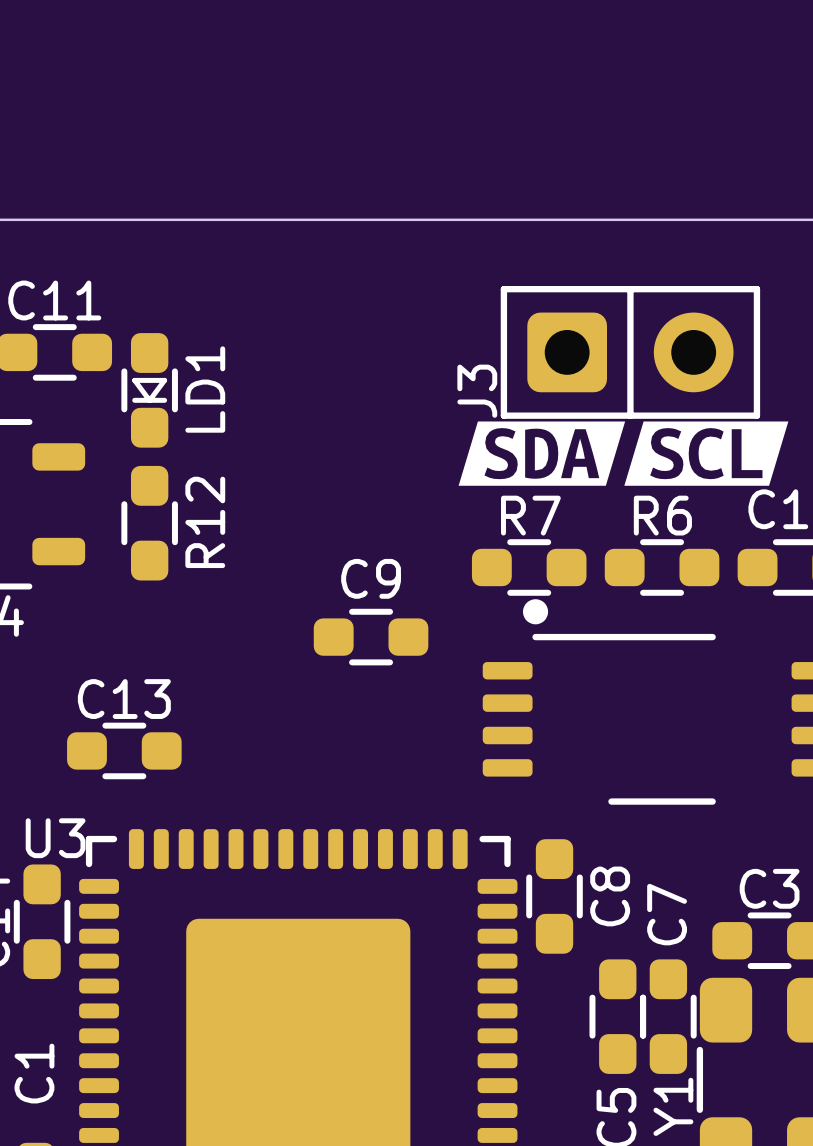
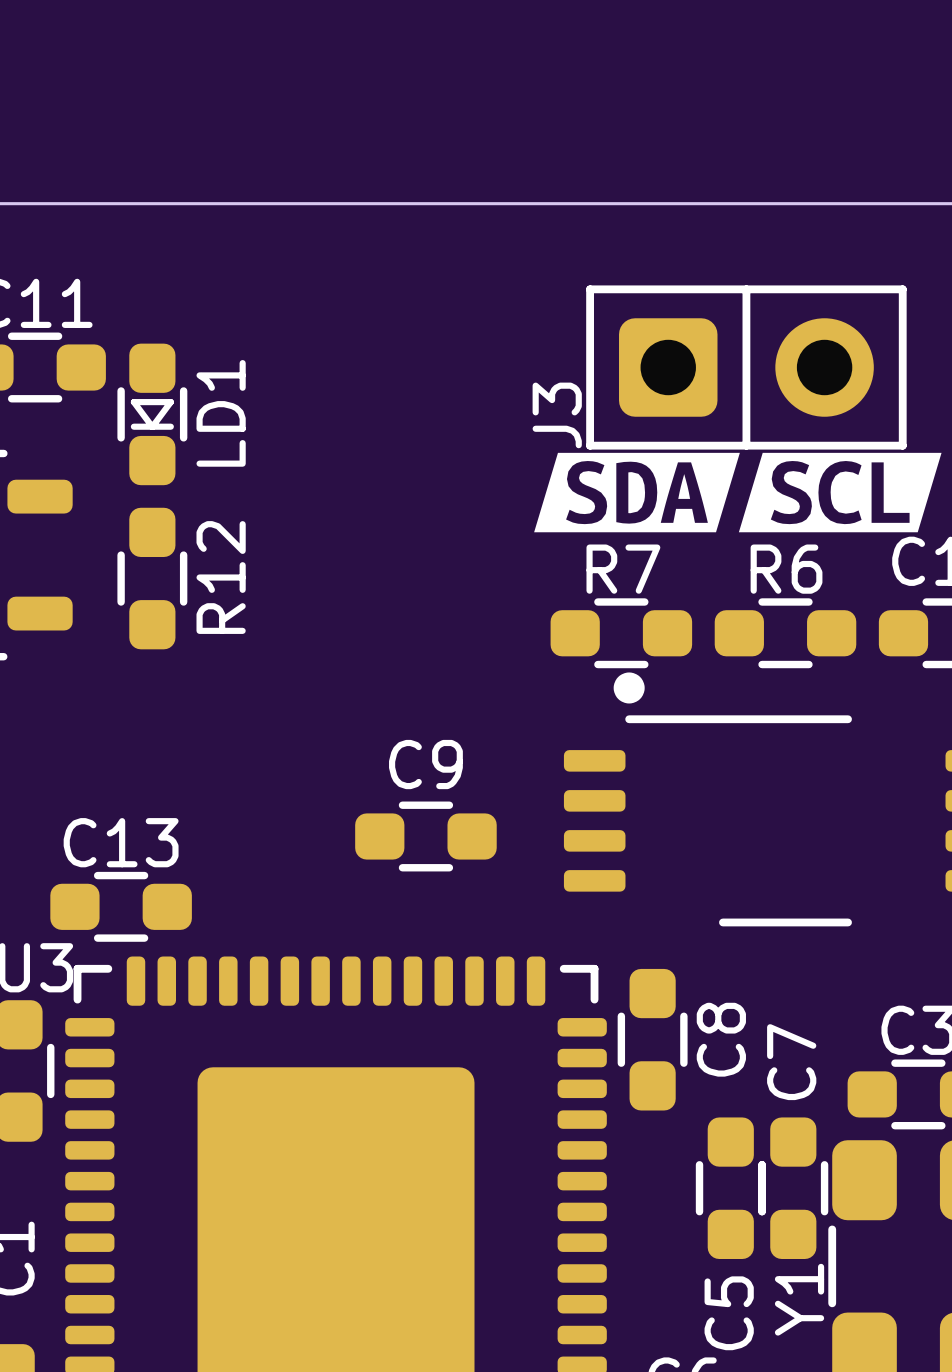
C9 position: (371, 637) -> (425, 836)
C13 position: (124, 750) -> (121, 906)

